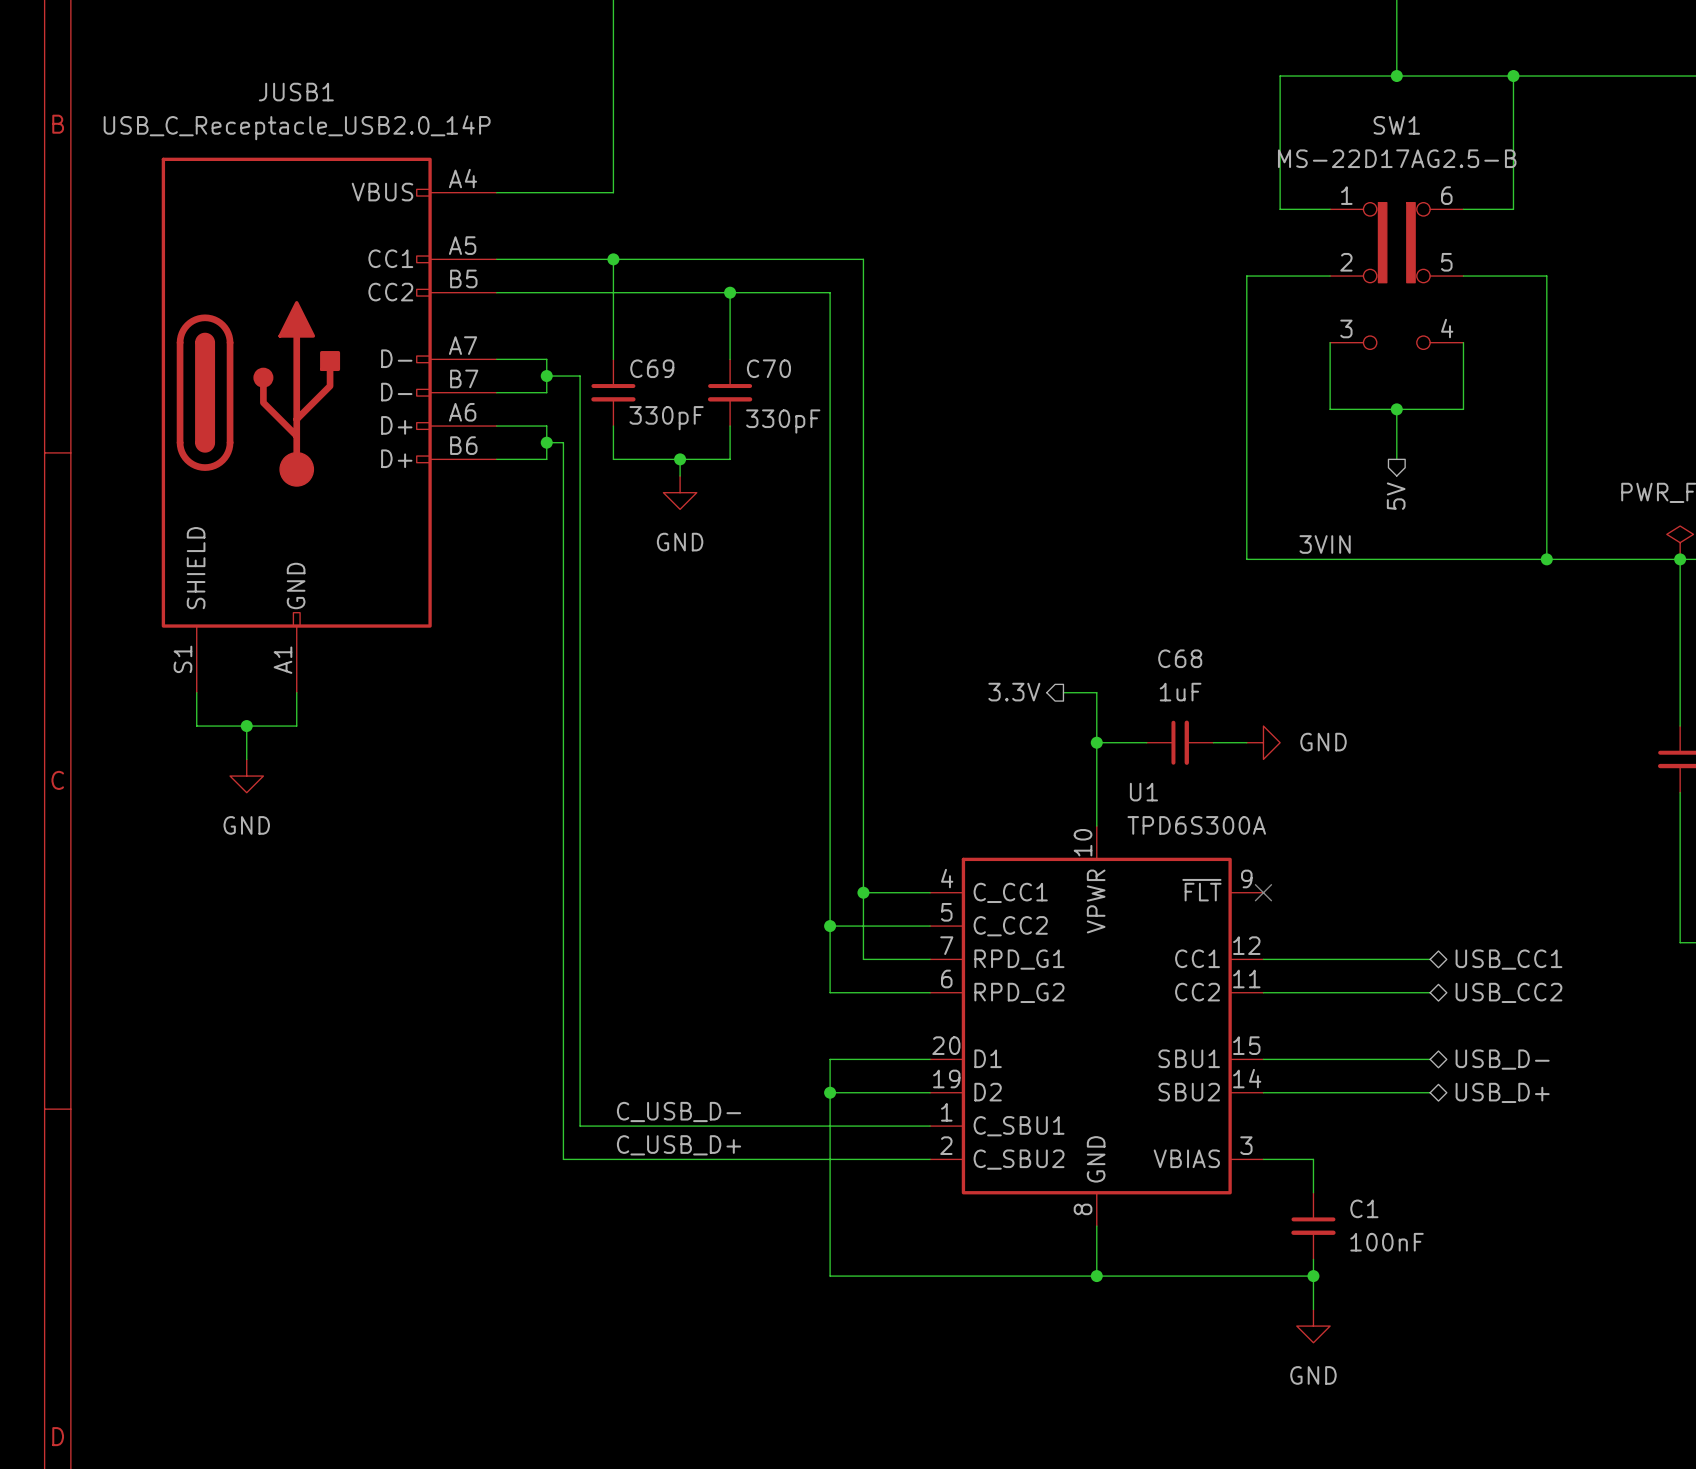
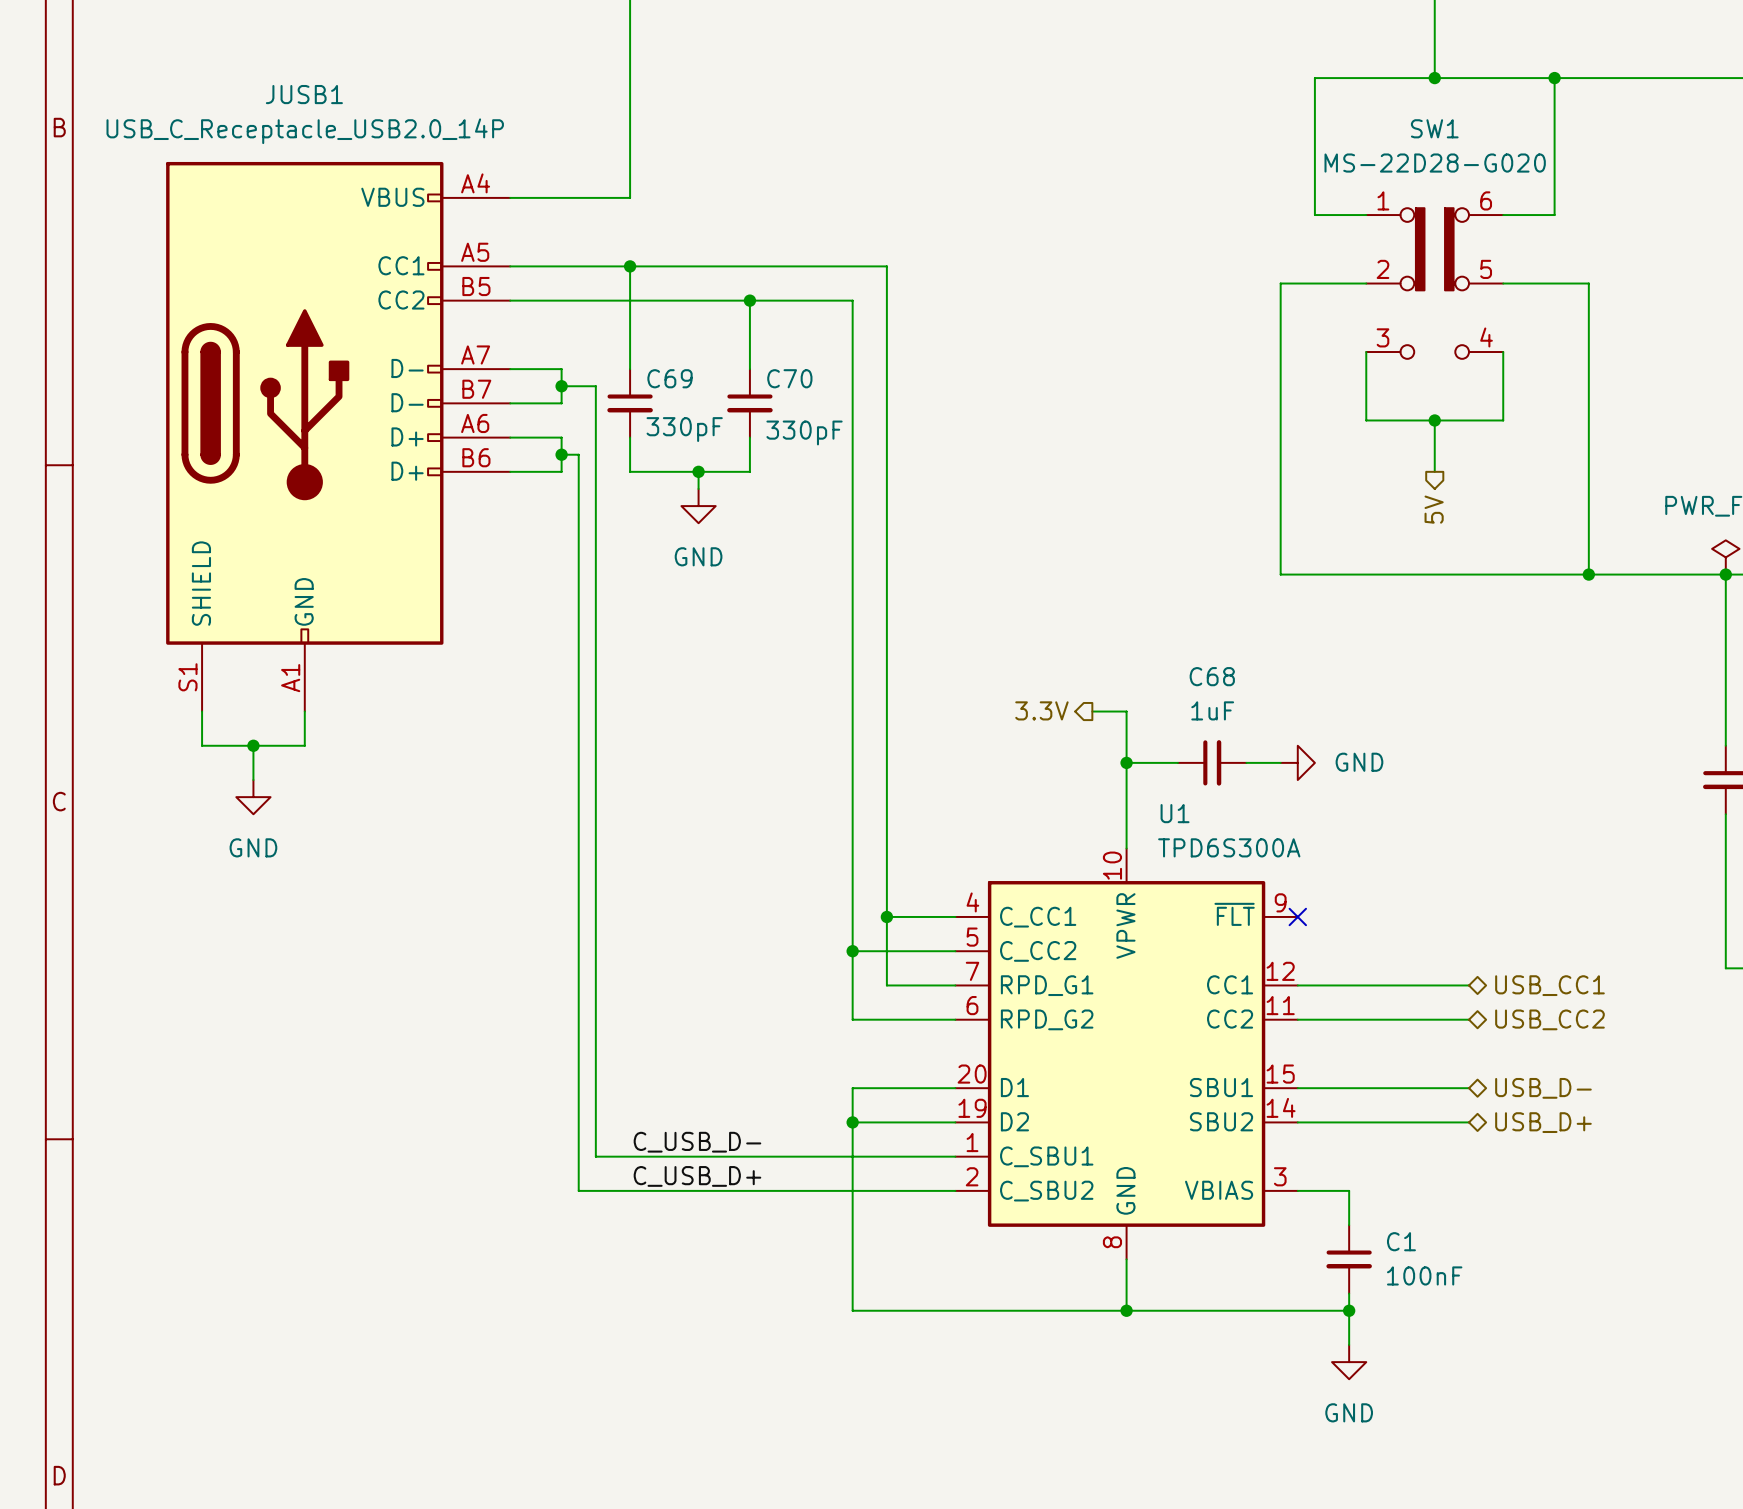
SW1 value: MS-22D17AG2.5-B (1397, 158) -> MS-22D28-G020 (1435, 163)
label: 3VIN (1325, 544) -> none

